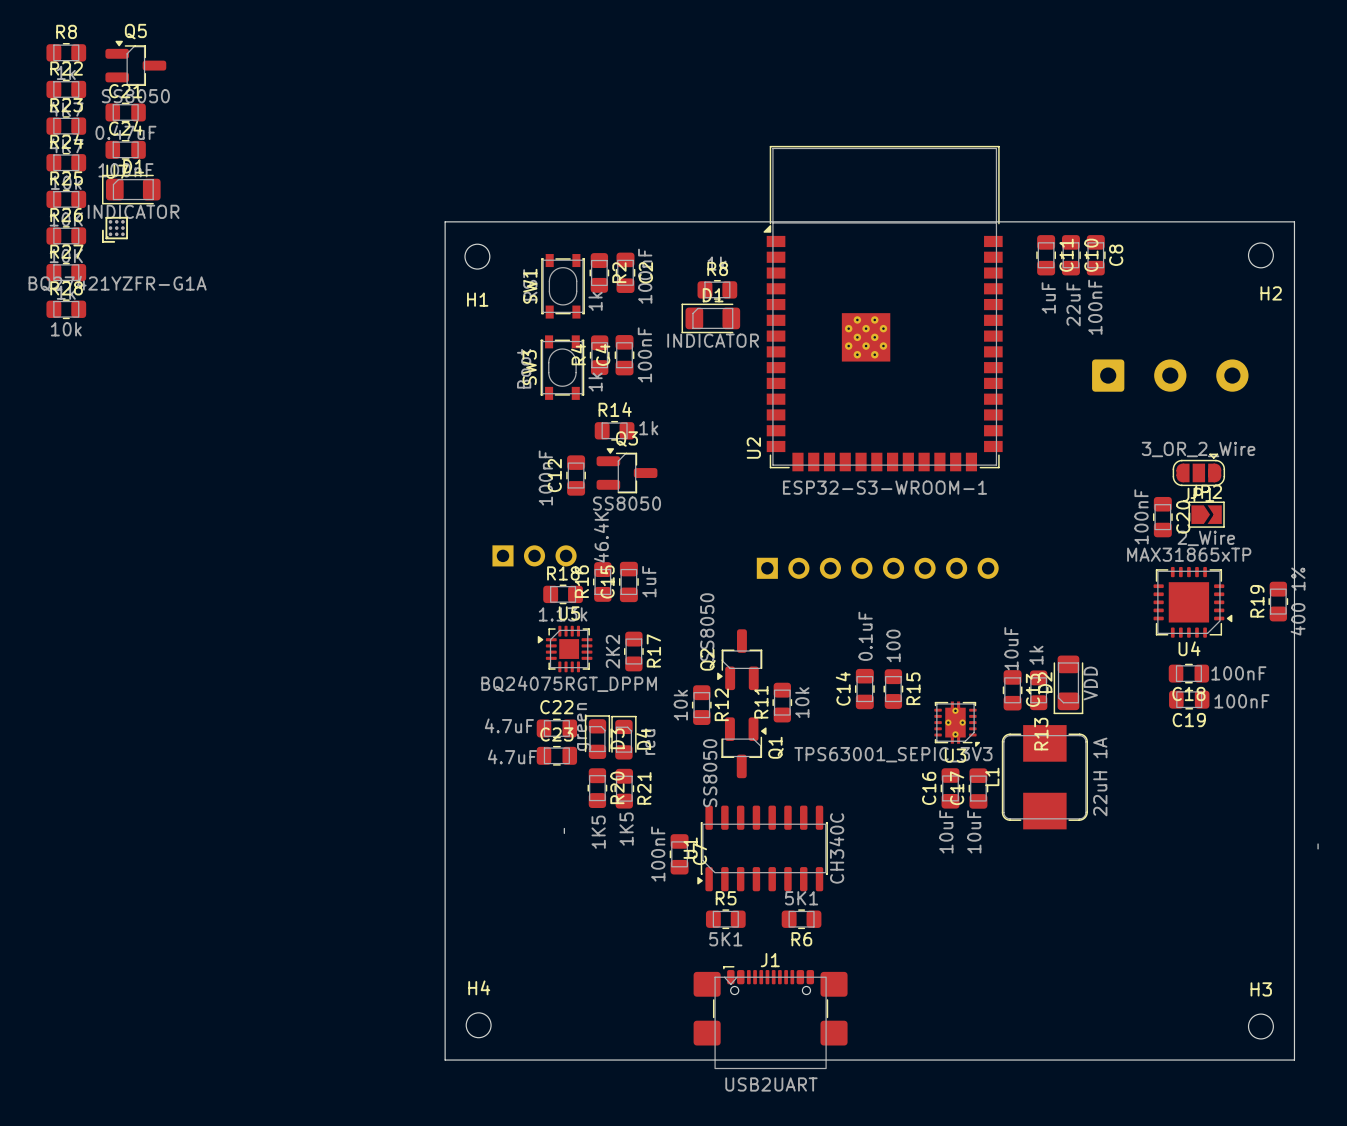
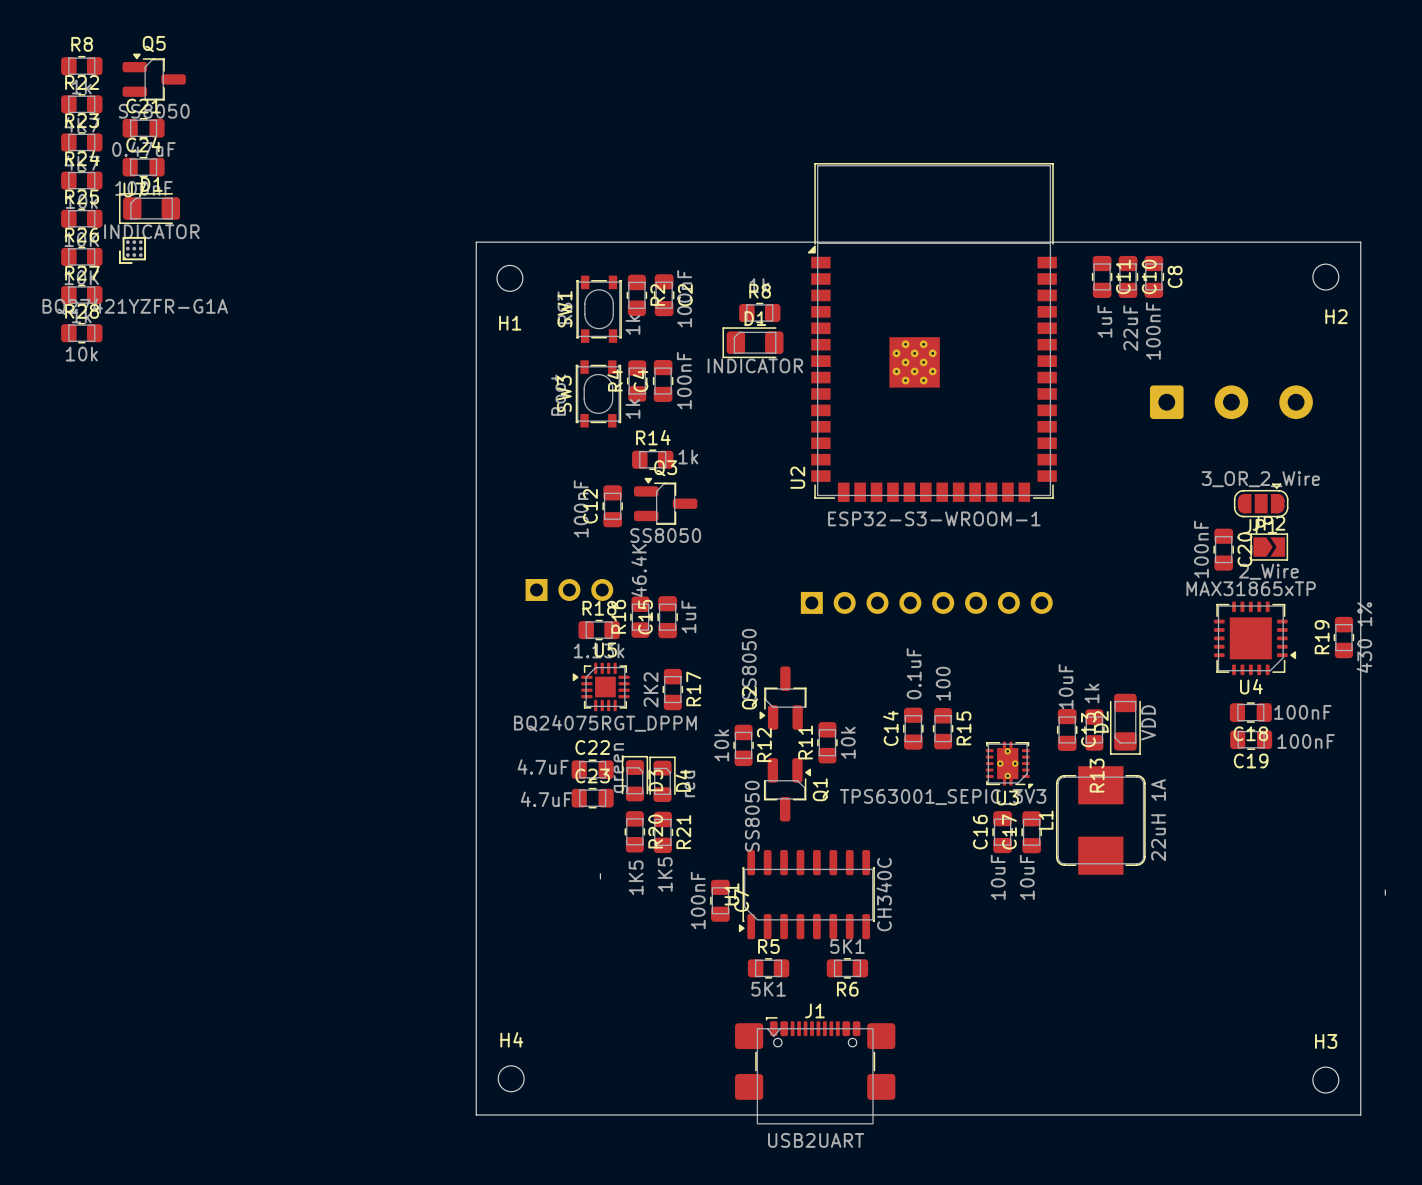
R19 value: 400 1% (1298, 601) -> 430 1% (1364, 637)

